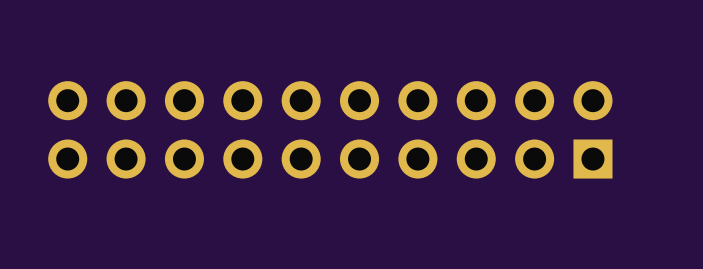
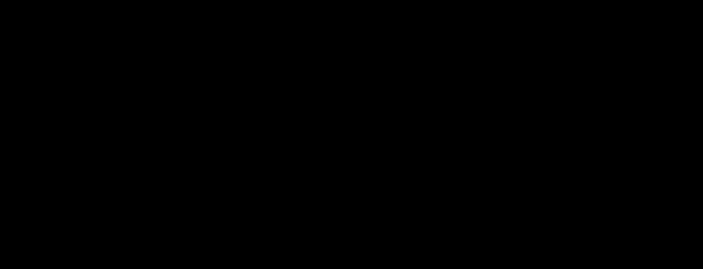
part: (330, 129) -> none

